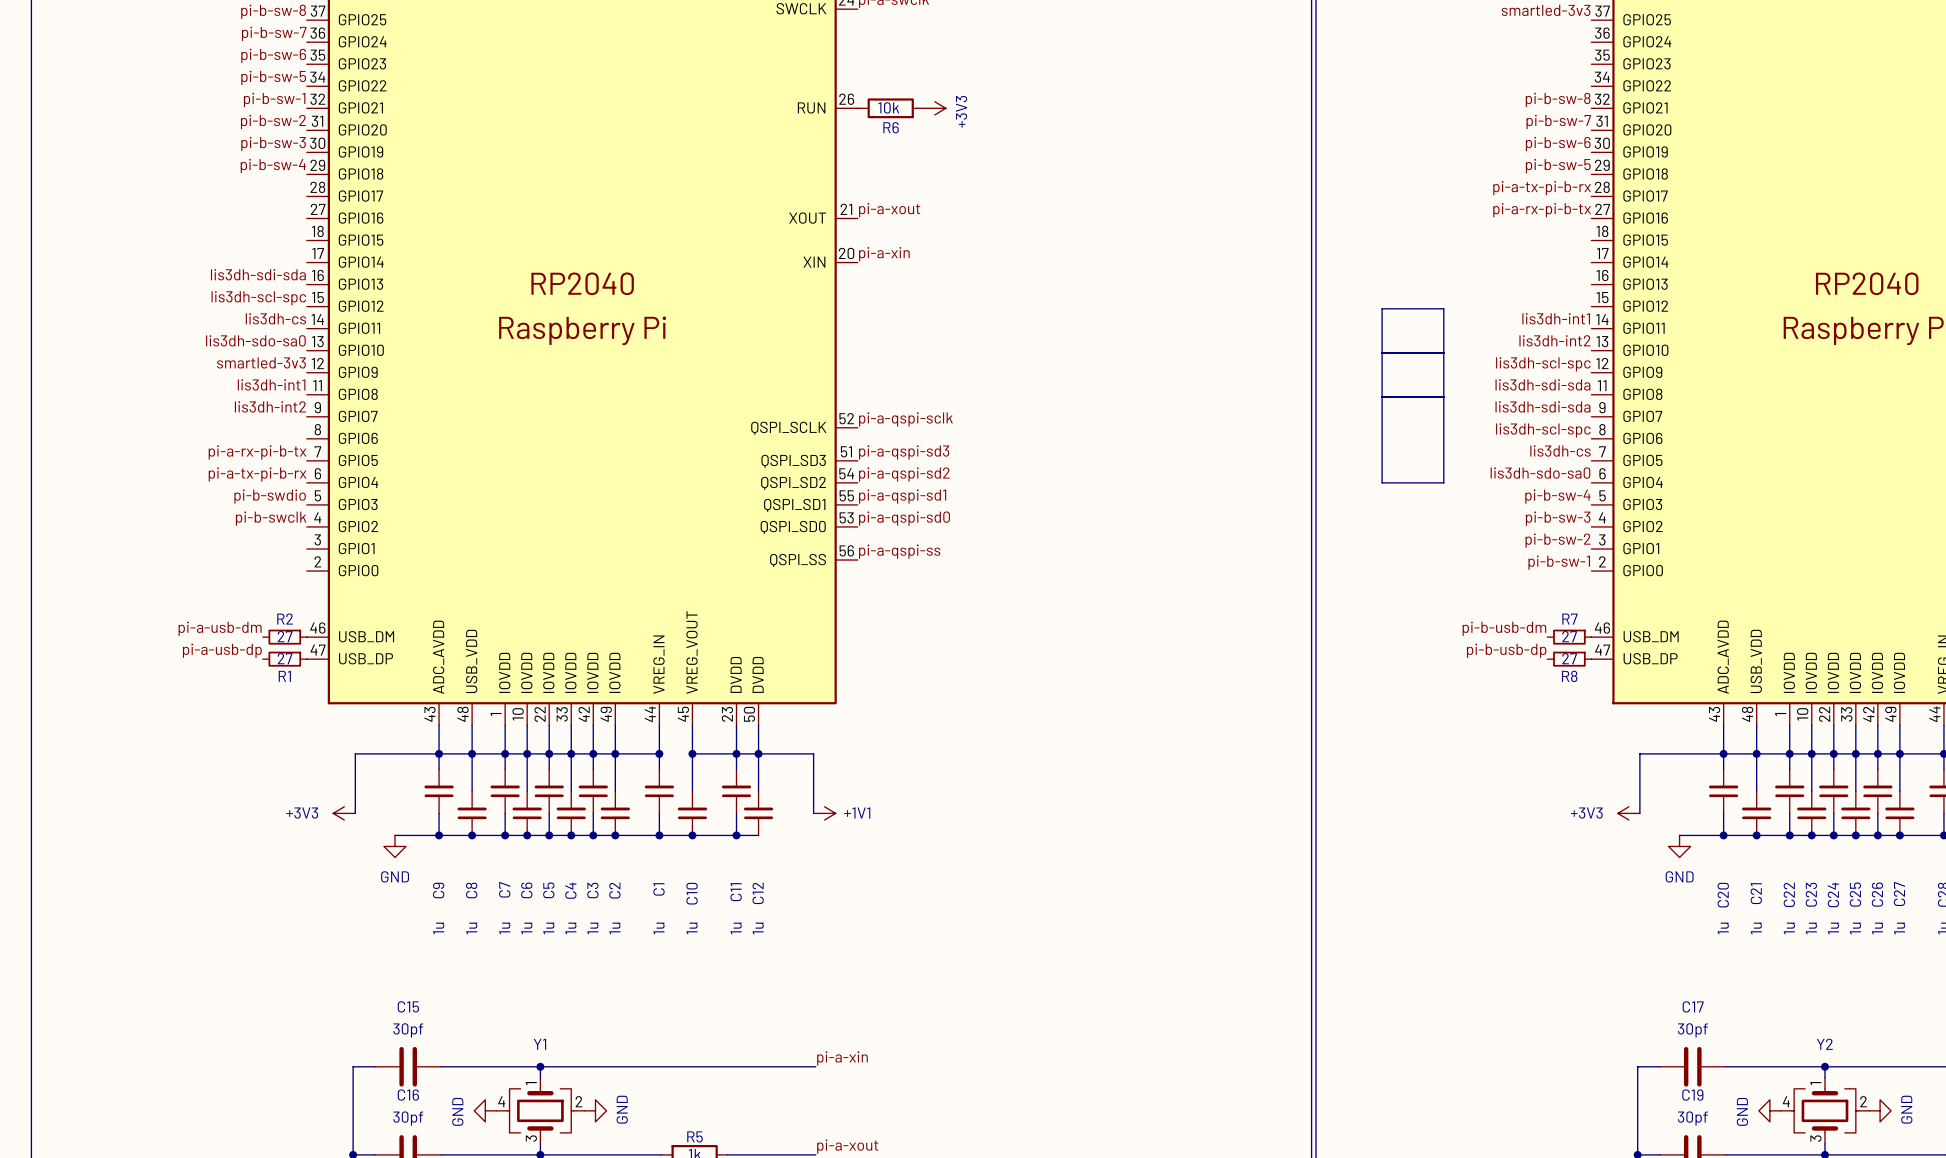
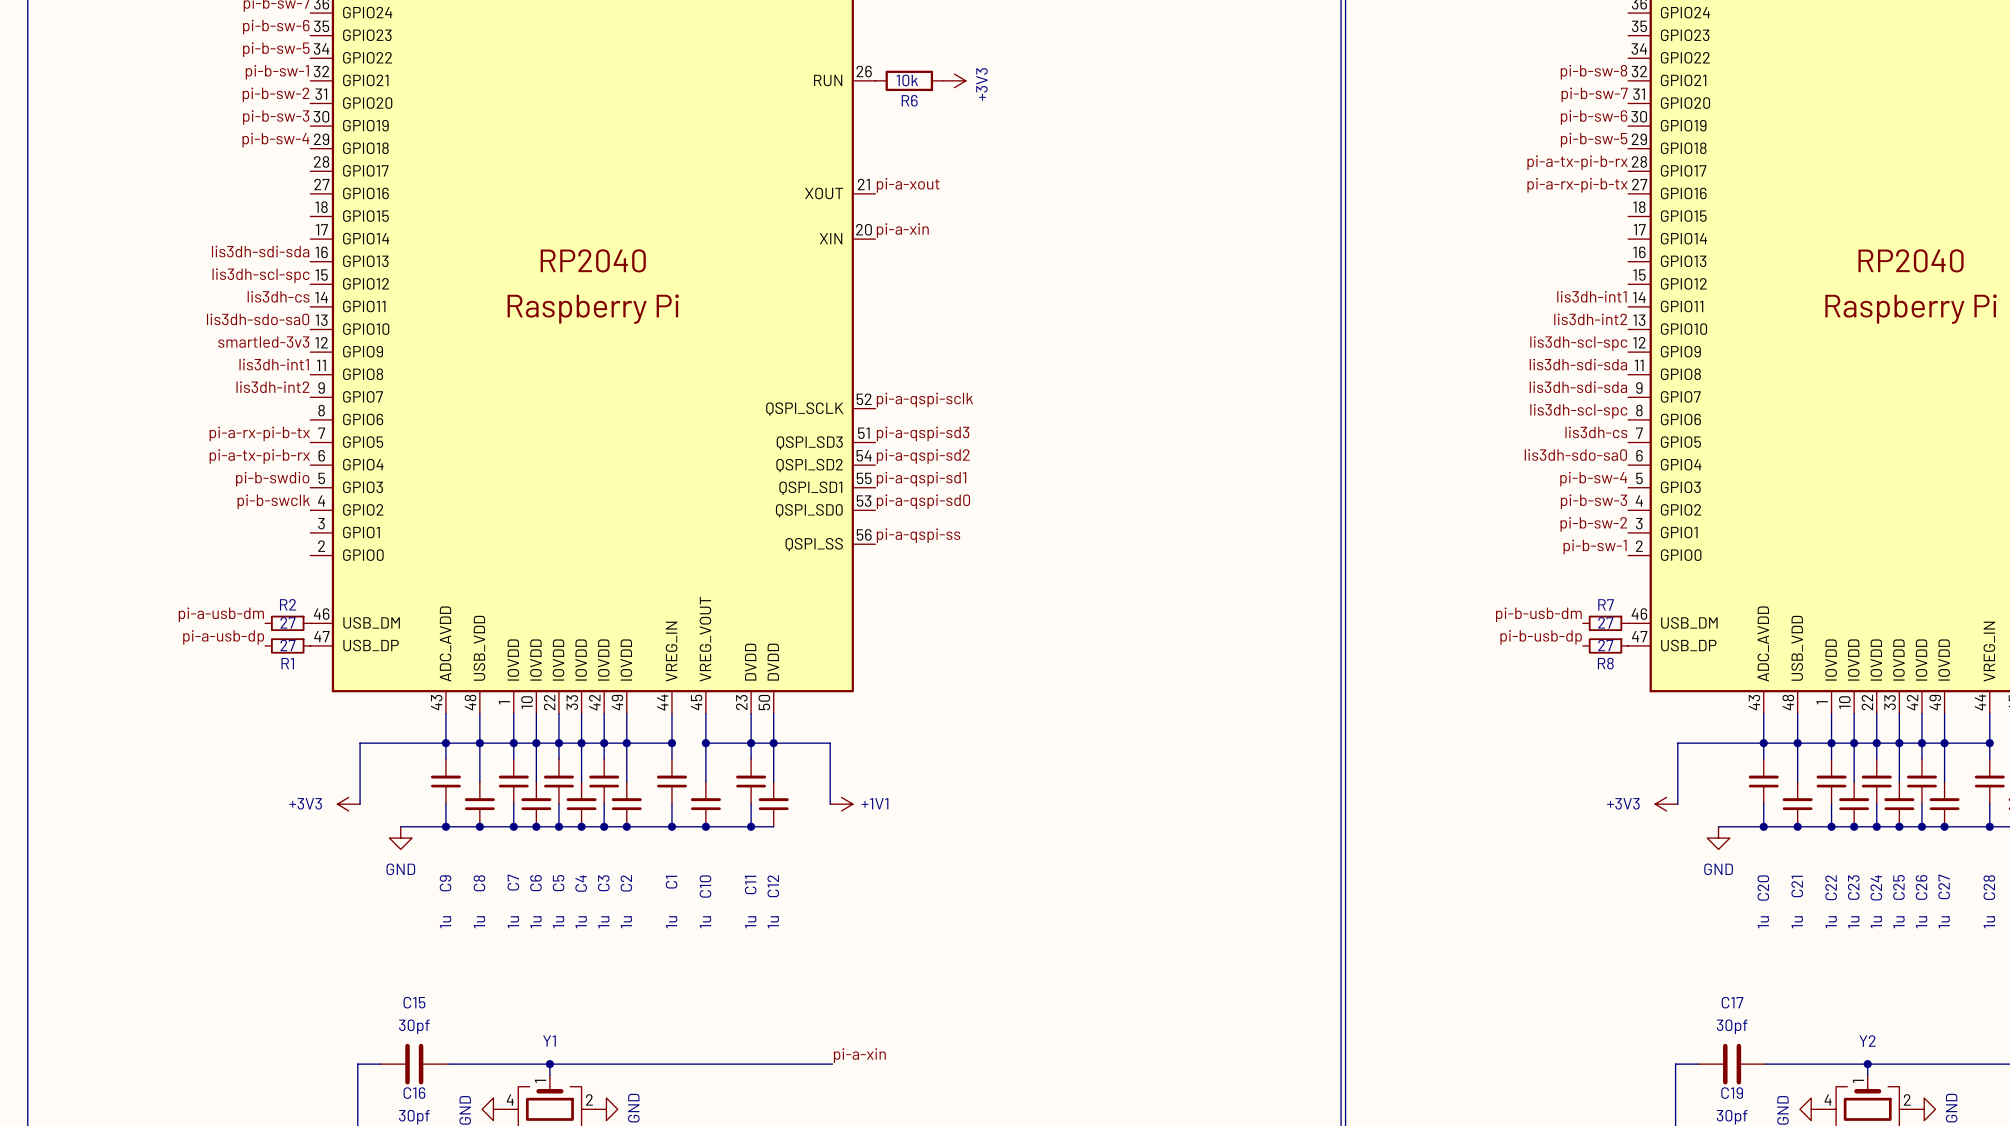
line: (1382, 308) (1382, 482) (1443, 482) (1443, 308) (1382, 308) -> none
line: (1382, 352) (1443, 352) -> none
line: (1382, 396) (1443, 396) -> none

